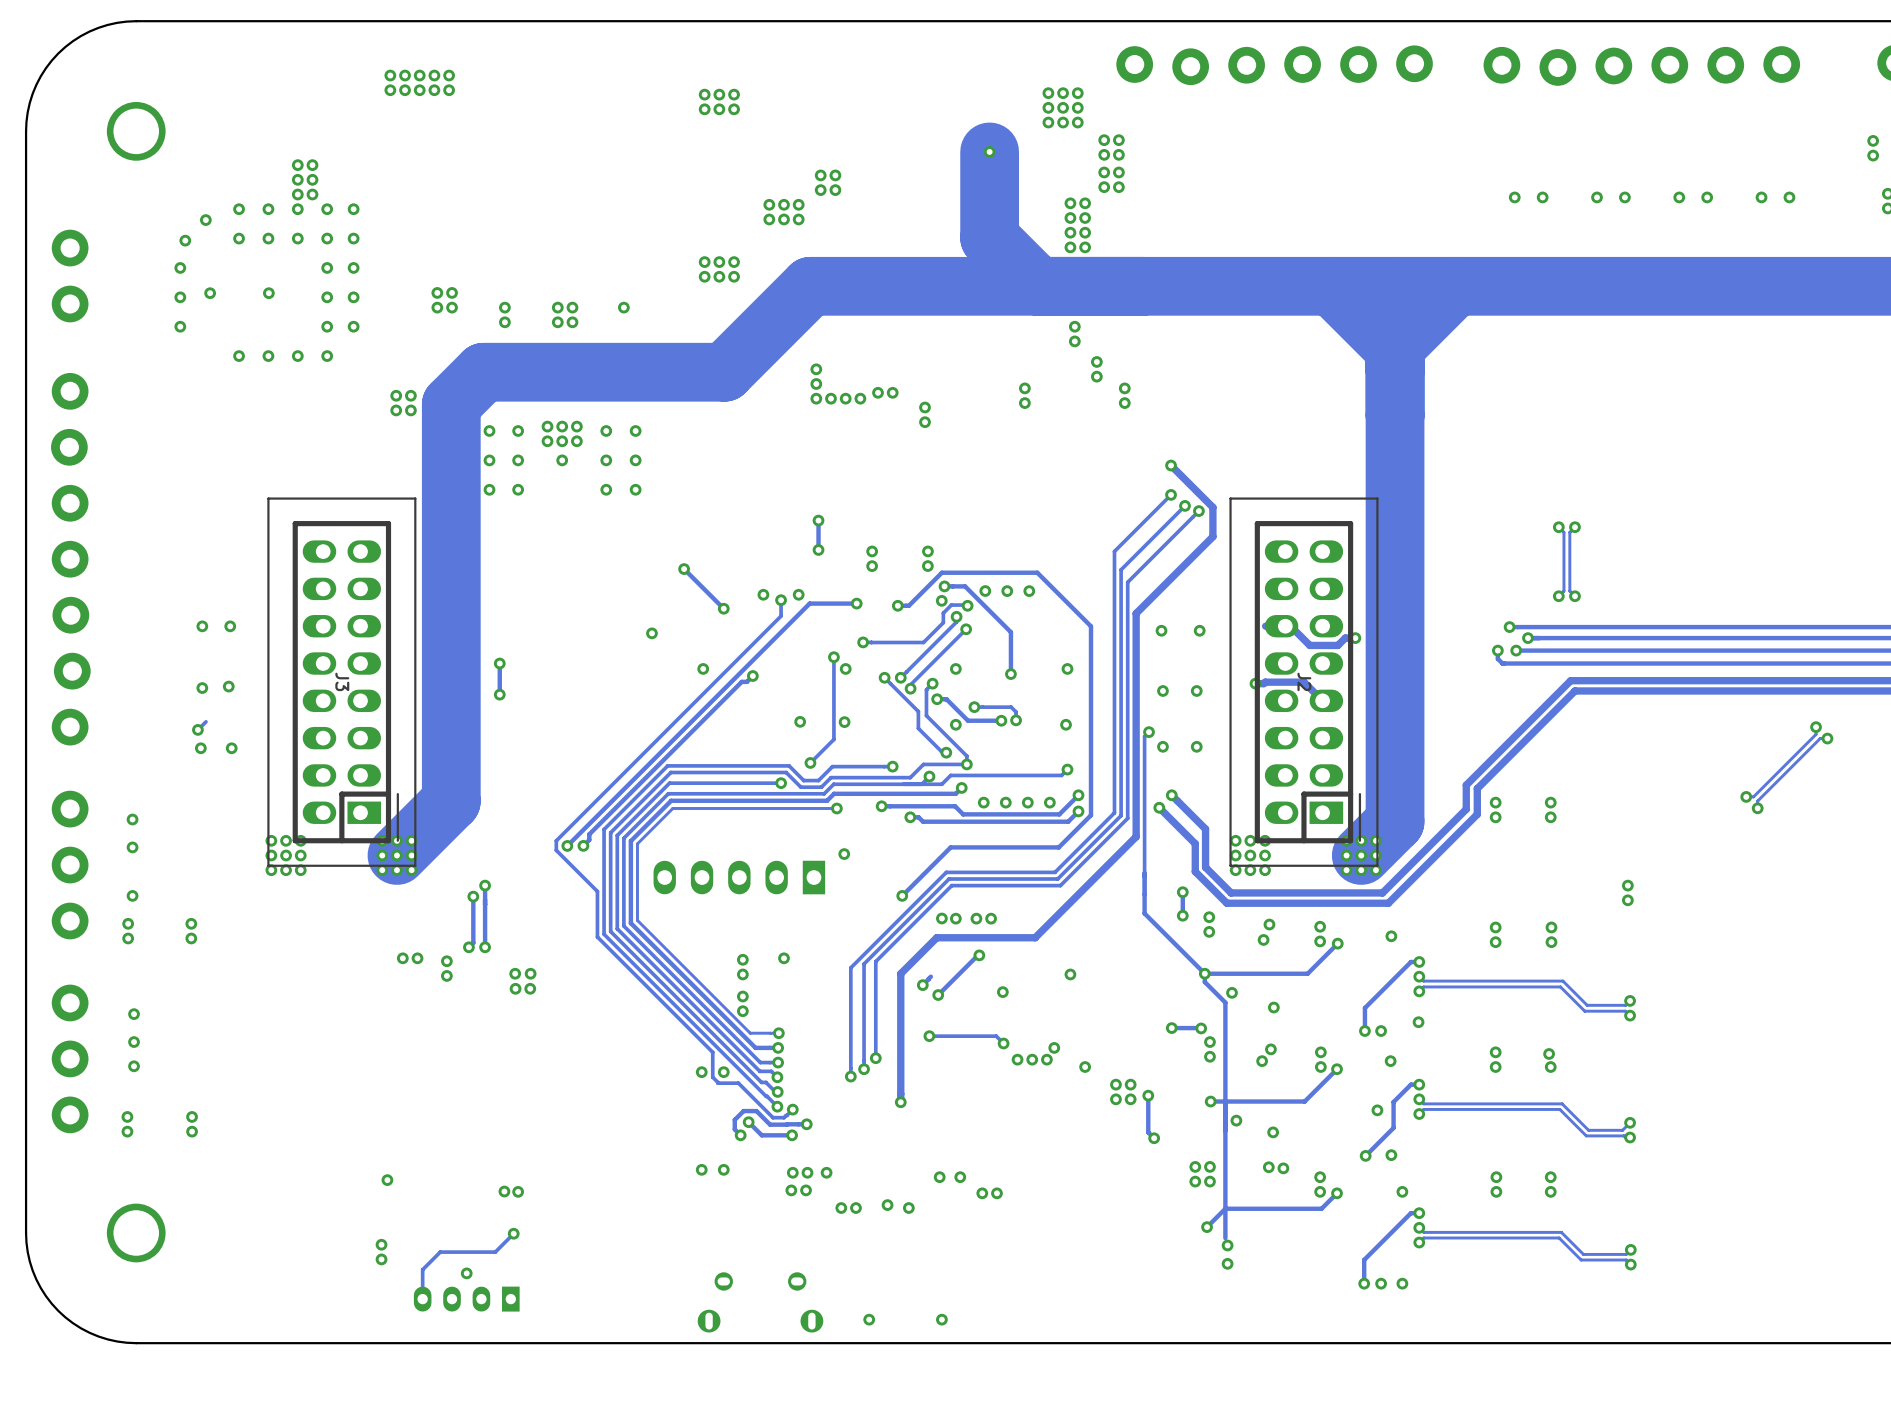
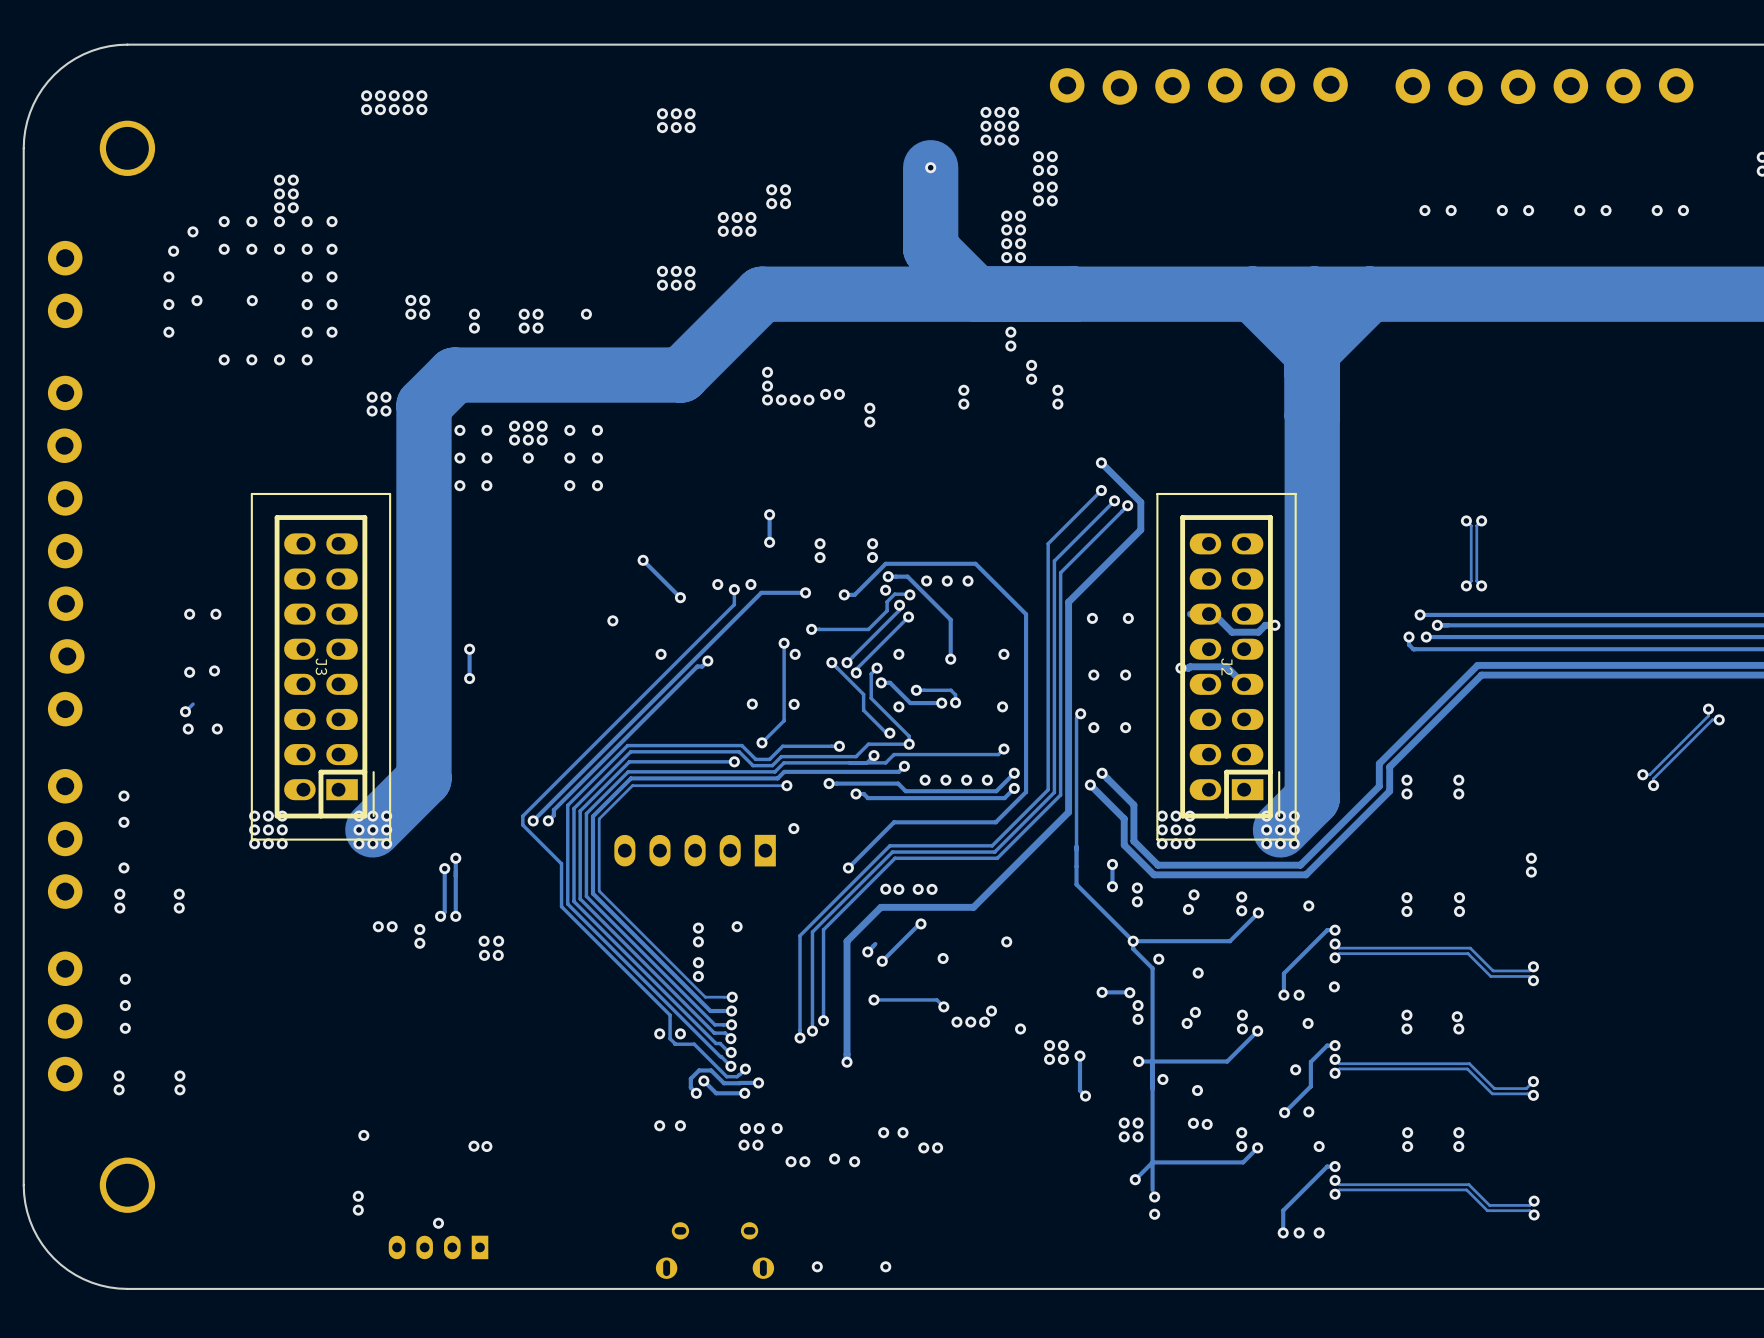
track: (513, 1233) (495, 1252) (440, 1252) (422, 1269) (422, 1299) -> none
via: (513, 1233) -> none

